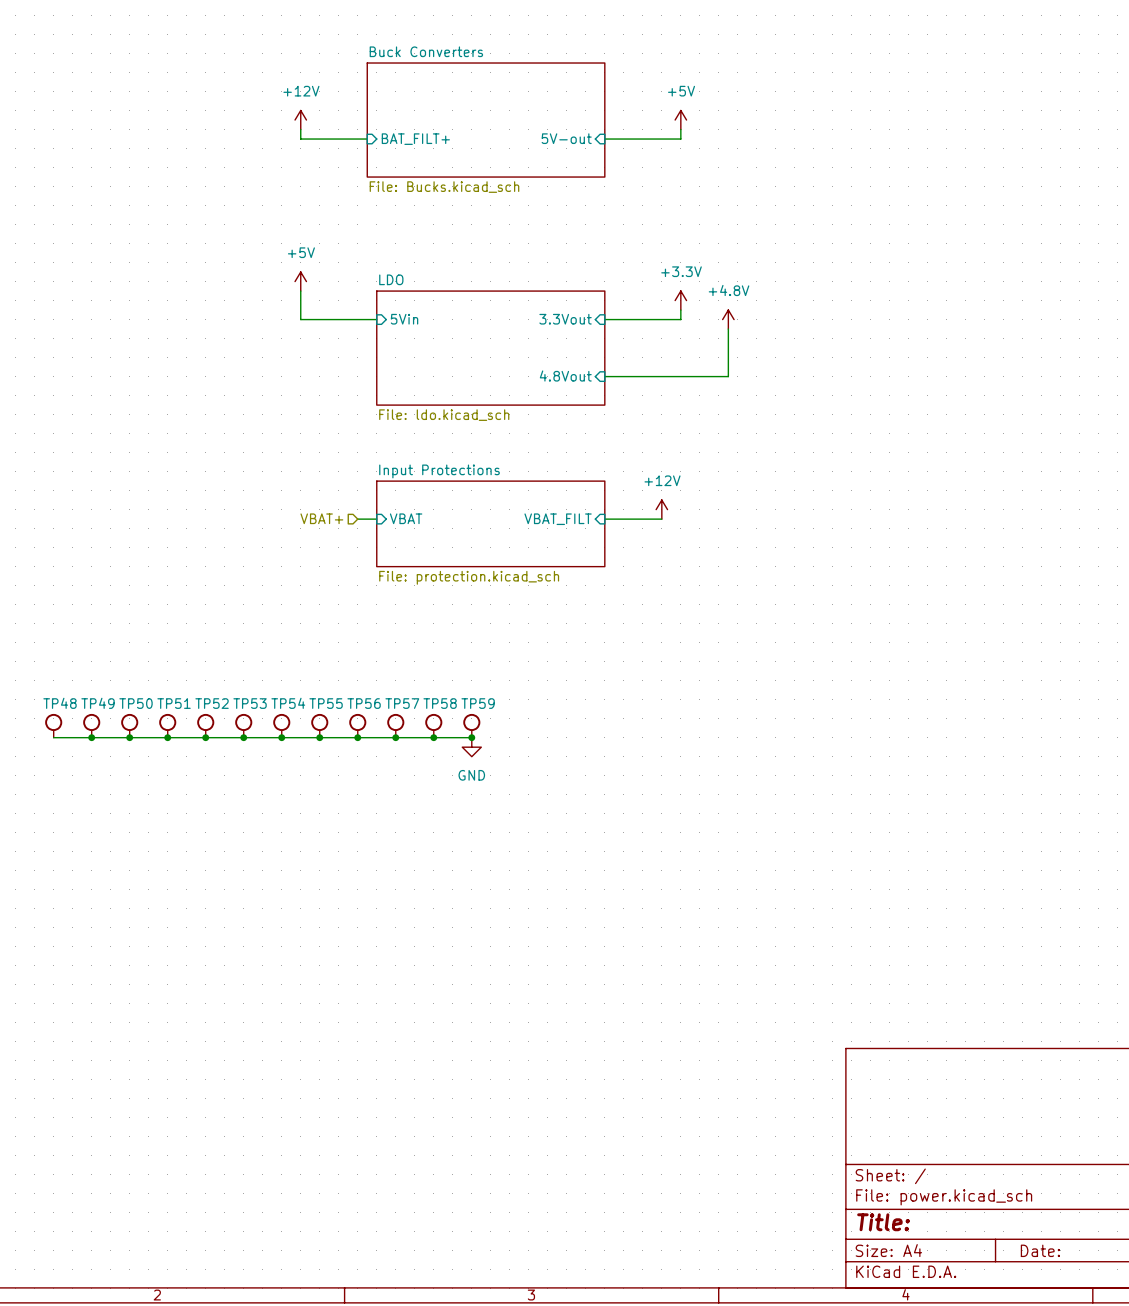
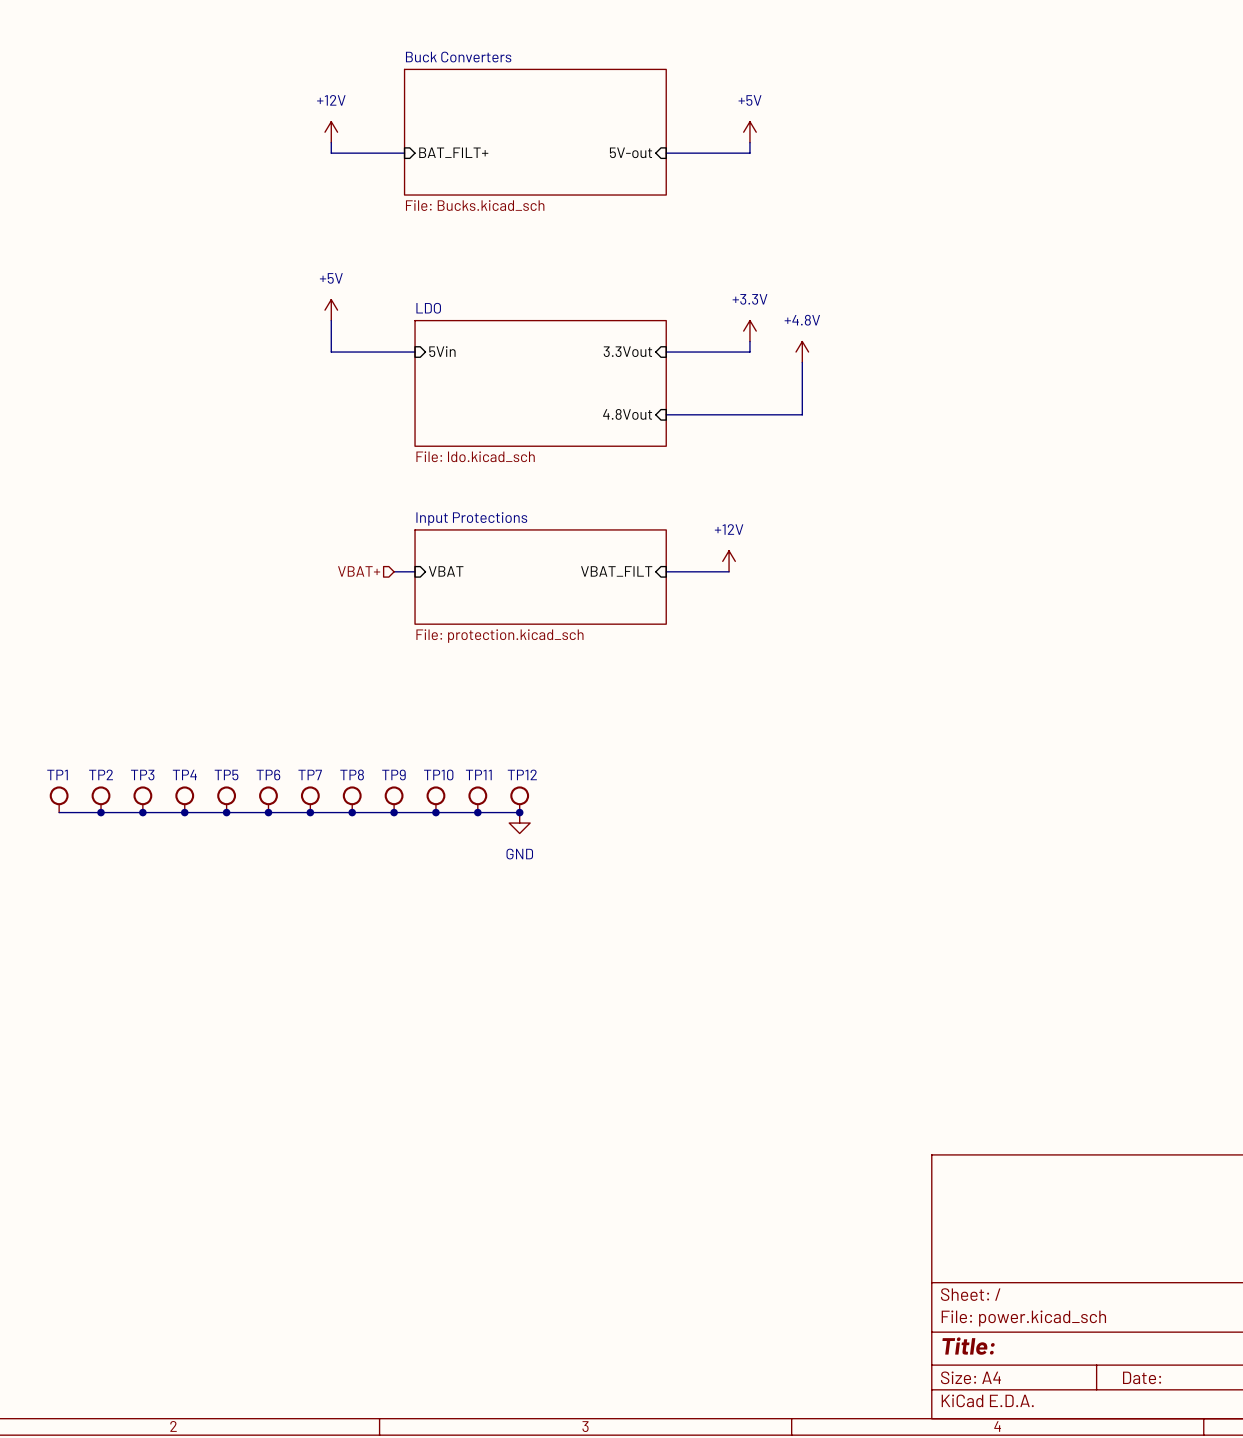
TP48 name: TP48 (60, 703) -> TP1 (57, 774)
TP49 name: TP49 (98, 703) -> TP2 (101, 774)
TP50 name: TP50 (136, 703) -> TP3 (142, 775)
TP51 name: TP51 (174, 703) -> TP4 (184, 774)
TP52 name: TP52 (212, 703) -> TP5 (226, 775)
TP53 name: TP53 (250, 703) -> TP6 (268, 774)
TP54 name: TP54 (288, 703) -> TP7 (310, 774)
TP55 name: TP55 (326, 703) -> TP8 (352, 774)
TP56 name: TP56 (364, 703) -> TP9 (393, 774)
TP57 name: TP57 (402, 703) -> TP10 (438, 774)
TP58 name: TP58 (440, 703) -> TP11 (478, 774)
TP59 name: TP59 (478, 703) -> TP12 (522, 774)

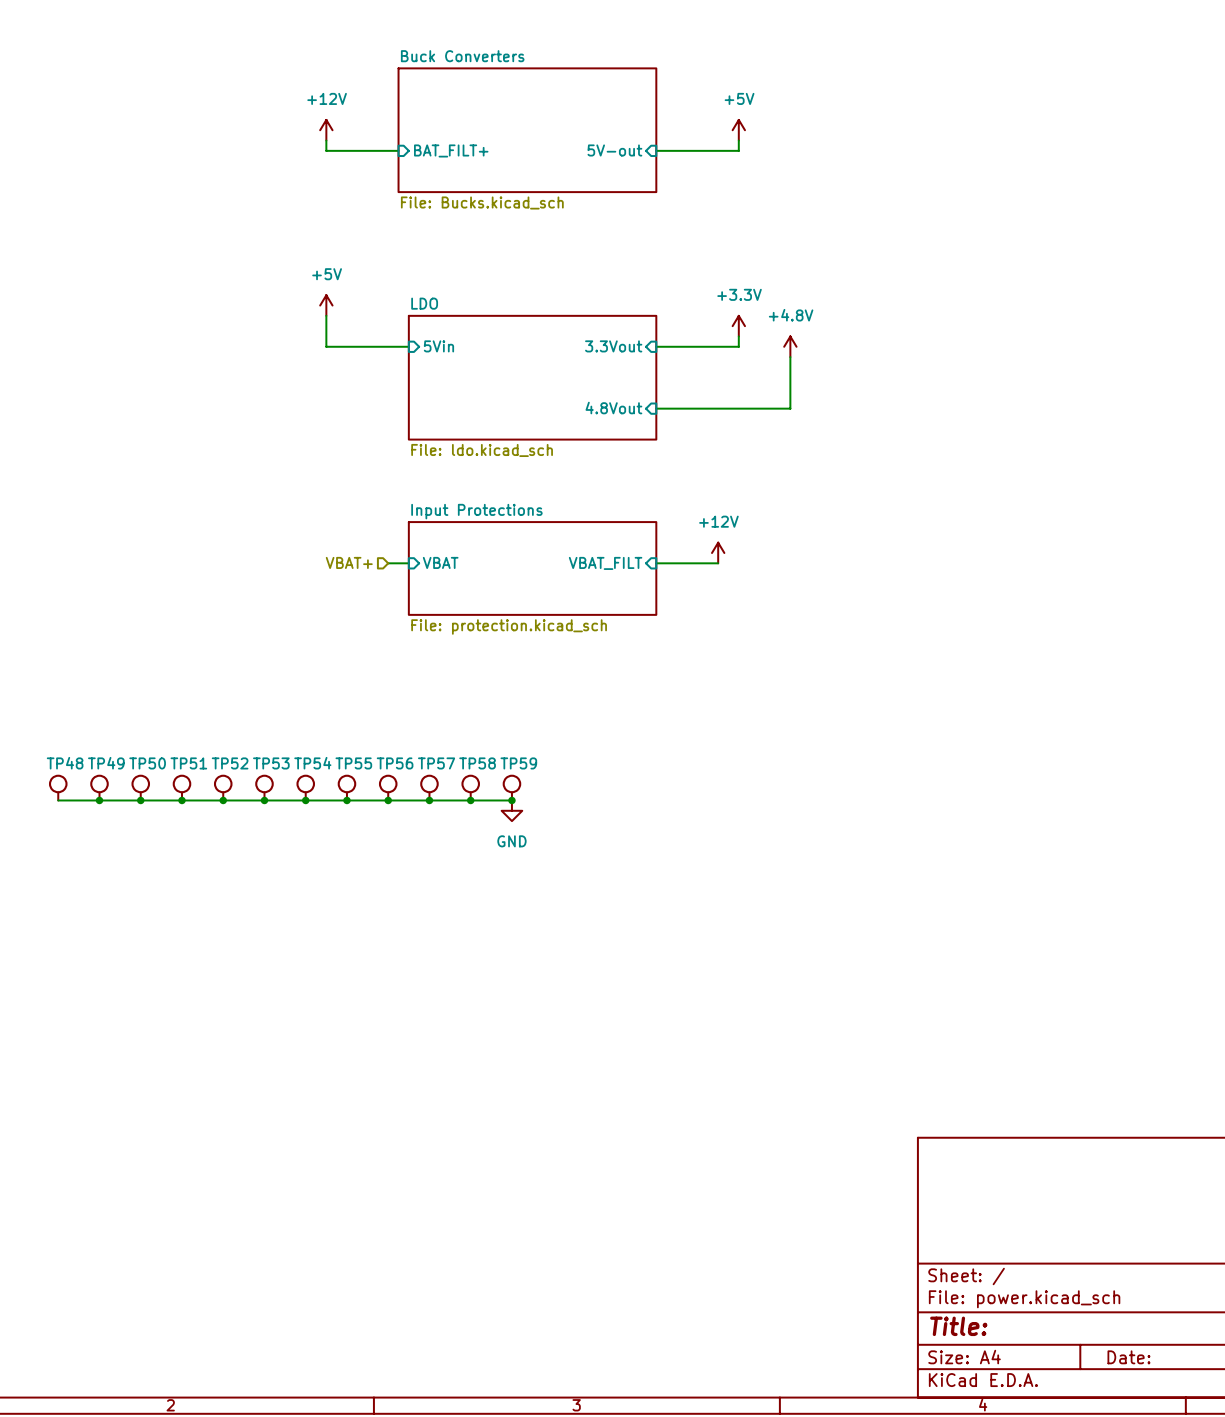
TP1 name: TP1 (57, 774) -> TP48 (65, 763)
TP2 name: TP2 (101, 774) -> TP49 (106, 763)
TP4 name: TP4 (184, 774) -> TP51 (188, 763)
TP6 name: TP6 (268, 774) -> TP53 (271, 763)
TP7 name: TP7 (310, 774) -> TP54 (312, 763)
TP8 name: TP8 (352, 774) -> TP55 (353, 763)
TP9 name: TP9 (393, 774) -> TP56 (395, 763)
TP10 name: TP10 (438, 774) -> TP57 (436, 763)
TP11 name: TP11 (478, 774) -> TP58 (477, 763)
TP12 name: TP12 (522, 774) -> TP59 (518, 763)
TP3 name: TP3 (142, 775) -> TP50 (147, 763)
TP5 name: TP5 (226, 775) -> TP52 (230, 763)

